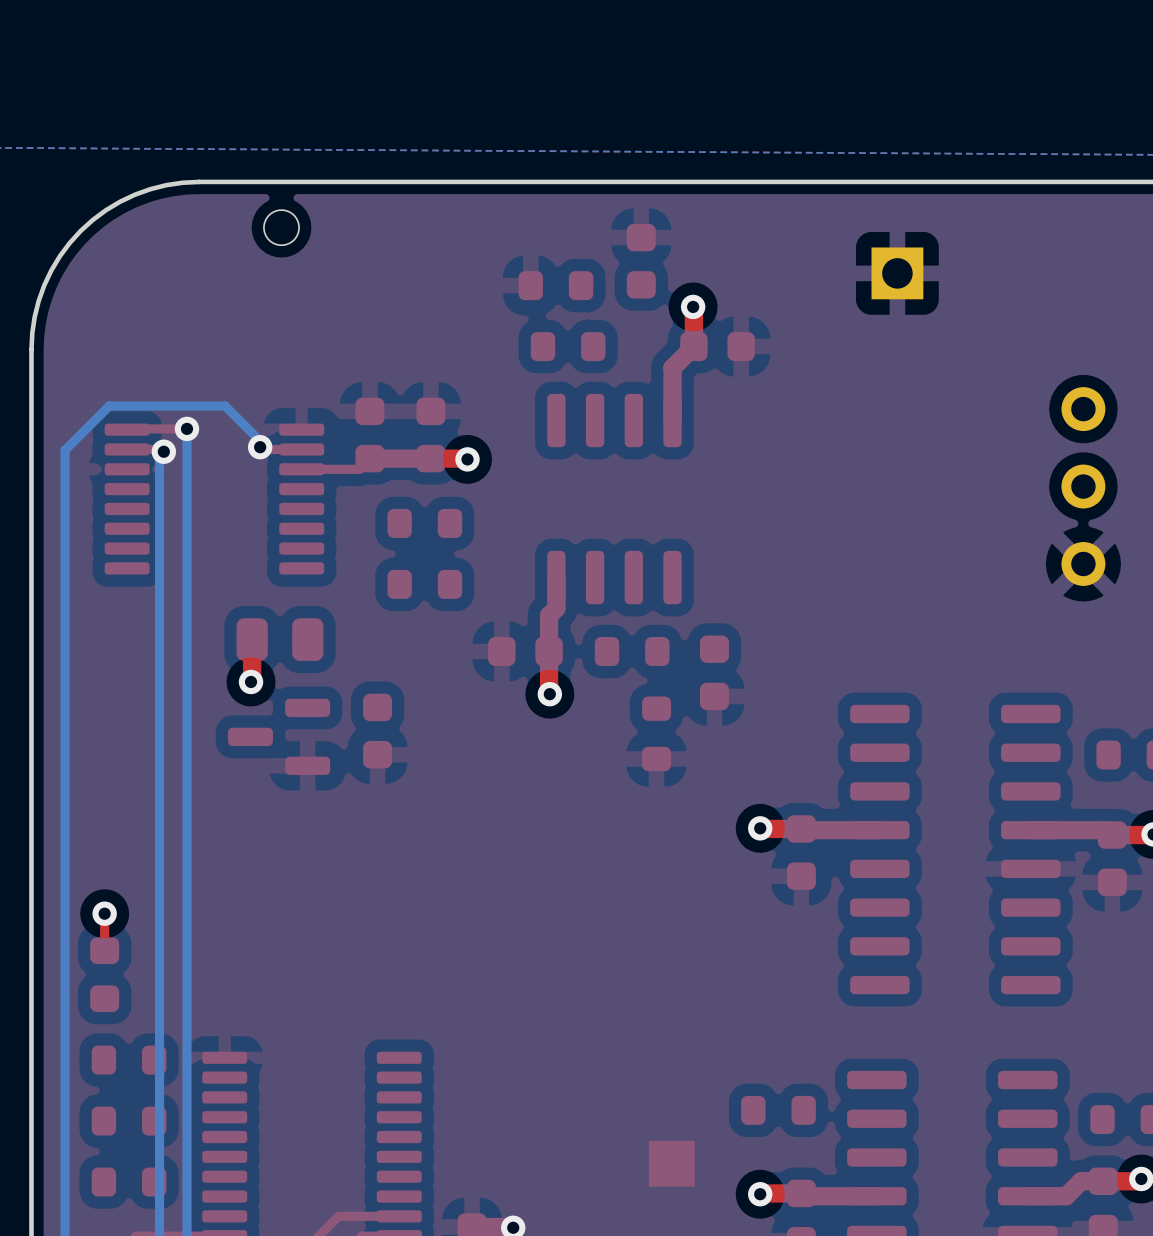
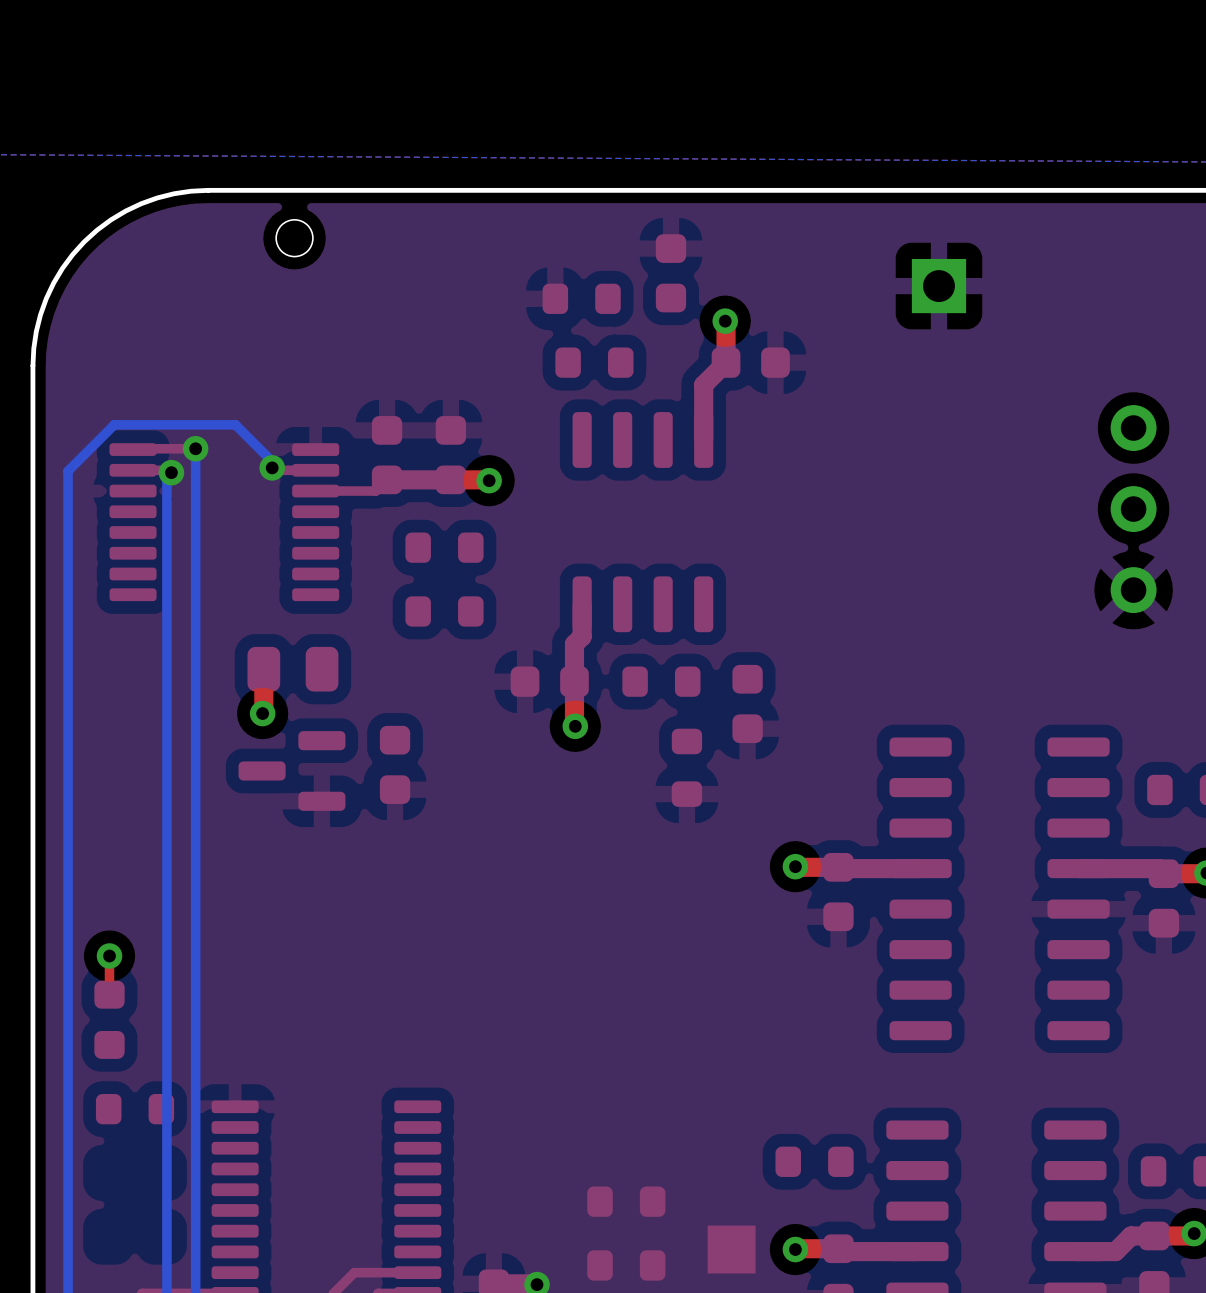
part: (129, 1121) -> none
part: none -> (626, 1201)
part position: (671, 1163) -> (731, 1249)
part: (129, 1182) -> none
part: none -> (626, 1265)

